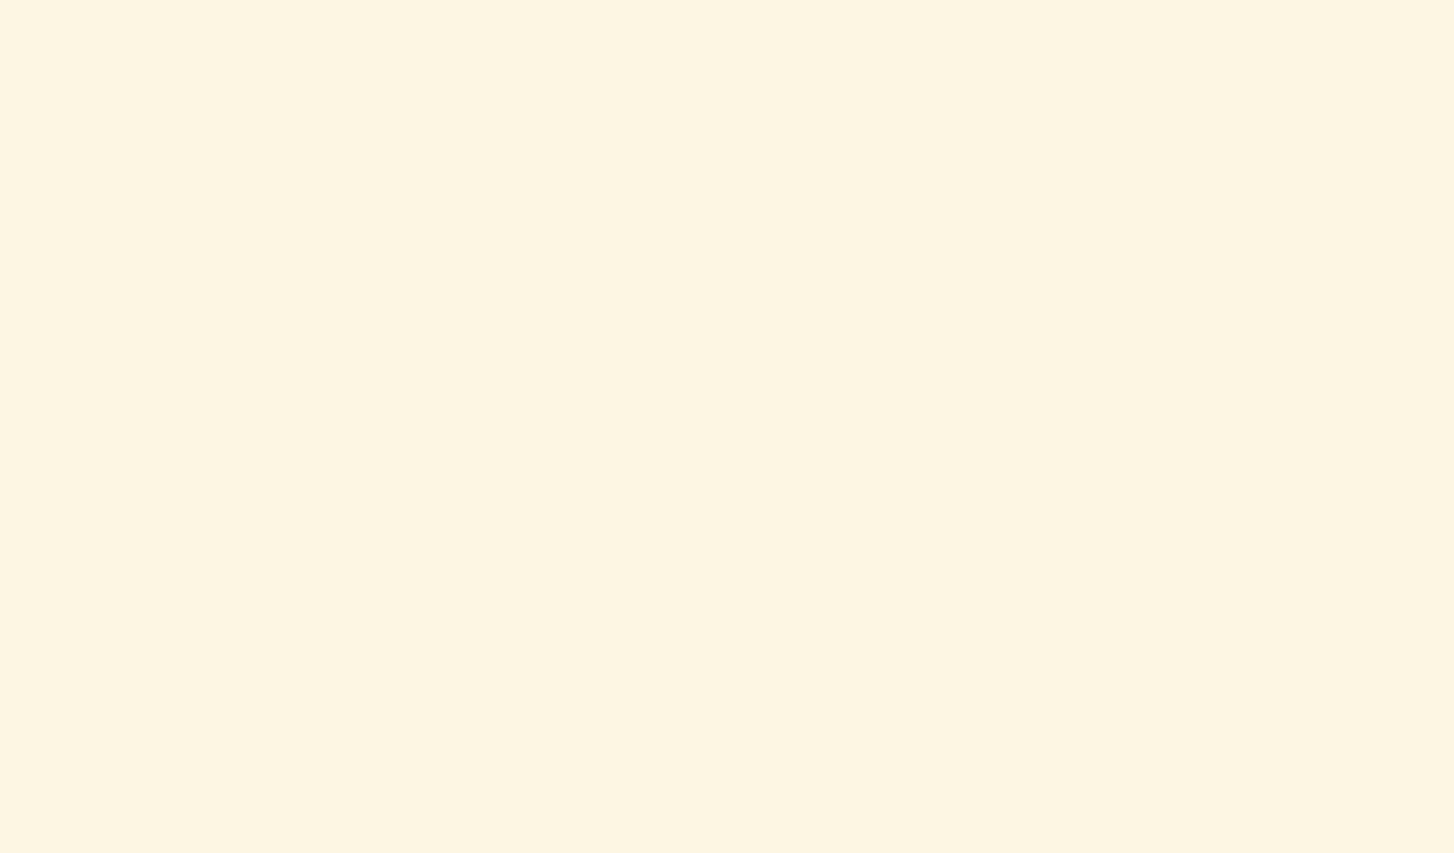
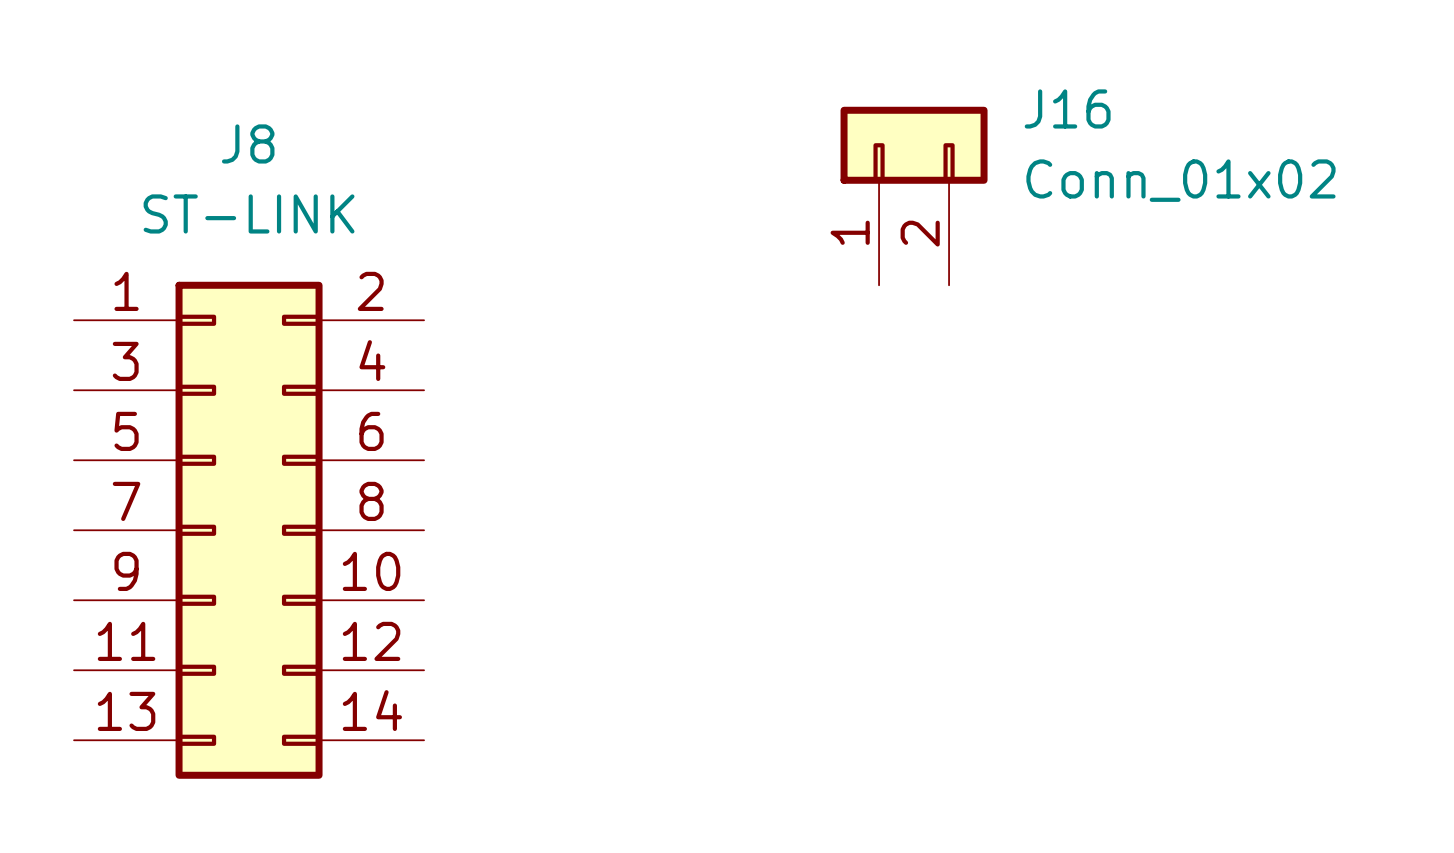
J16: none -> Conn_01x02 (914, 196)
J8: none -> ST-LINK (249, 530)

